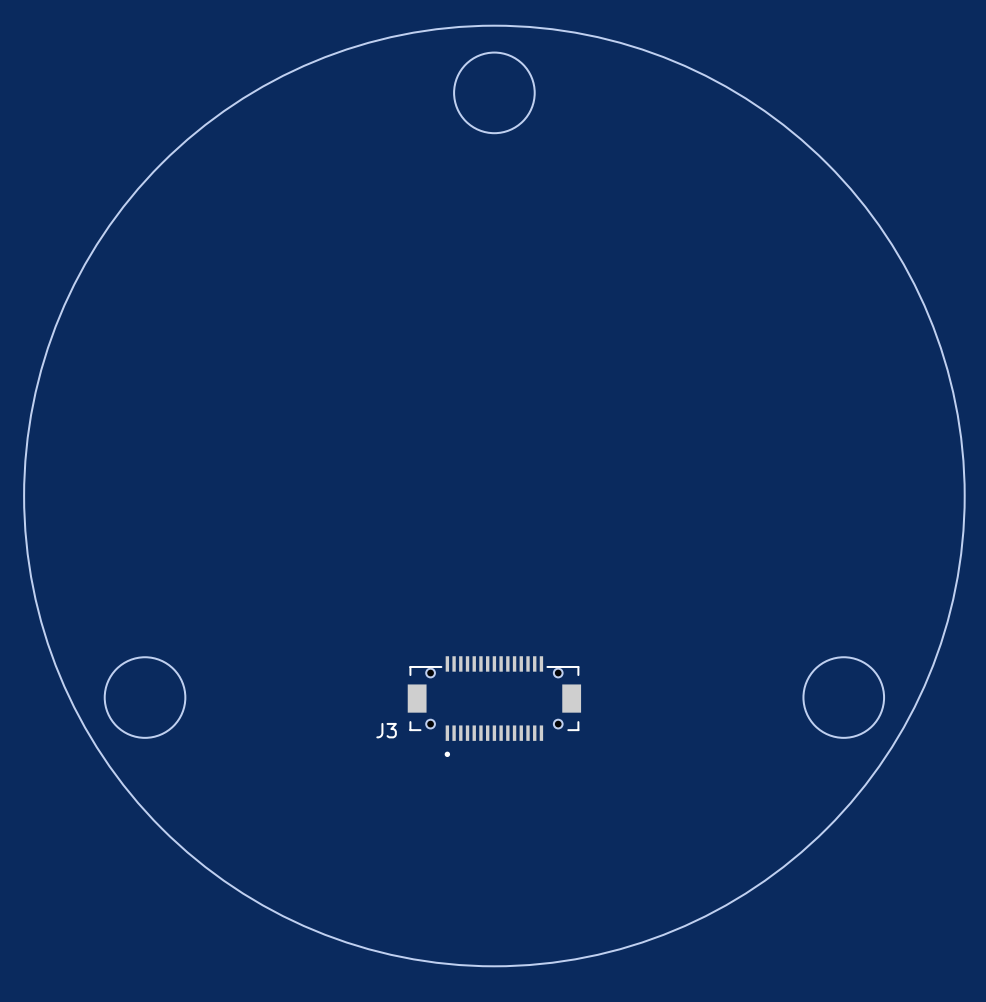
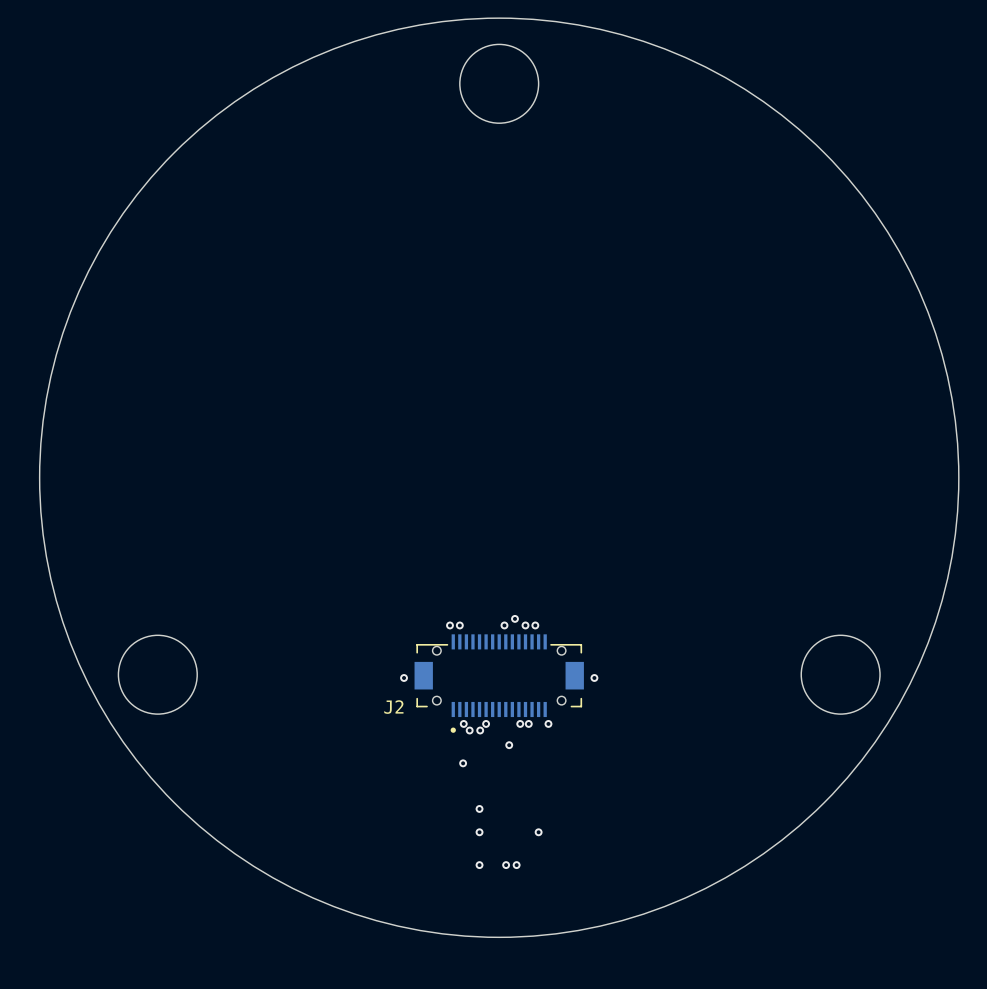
via: none -> (514, 618)
via: none -> (449, 625)
via: none -> (459, 625)
via: none -> (504, 625)
via: none -> (525, 625)
via: none -> (535, 625)
via: none -> (404, 677)
via: none -> (594, 677)
J3 name: J3 (386, 730) -> J2 (393, 707)
via: none -> (463, 723)
via: none -> (486, 723)
via: none -> (520, 723)
via: none -> (528, 723)
via: none -> (548, 723)
via: none -> (469, 730)
via: none -> (480, 730)
via: none -> (509, 745)
via: none -> (463, 763)
via: none -> (479, 808)
via: none -> (479, 832)
via: none -> (538, 832)
via: none -> (479, 865)
via: none -> (506, 865)
via: none -> (516, 865)

